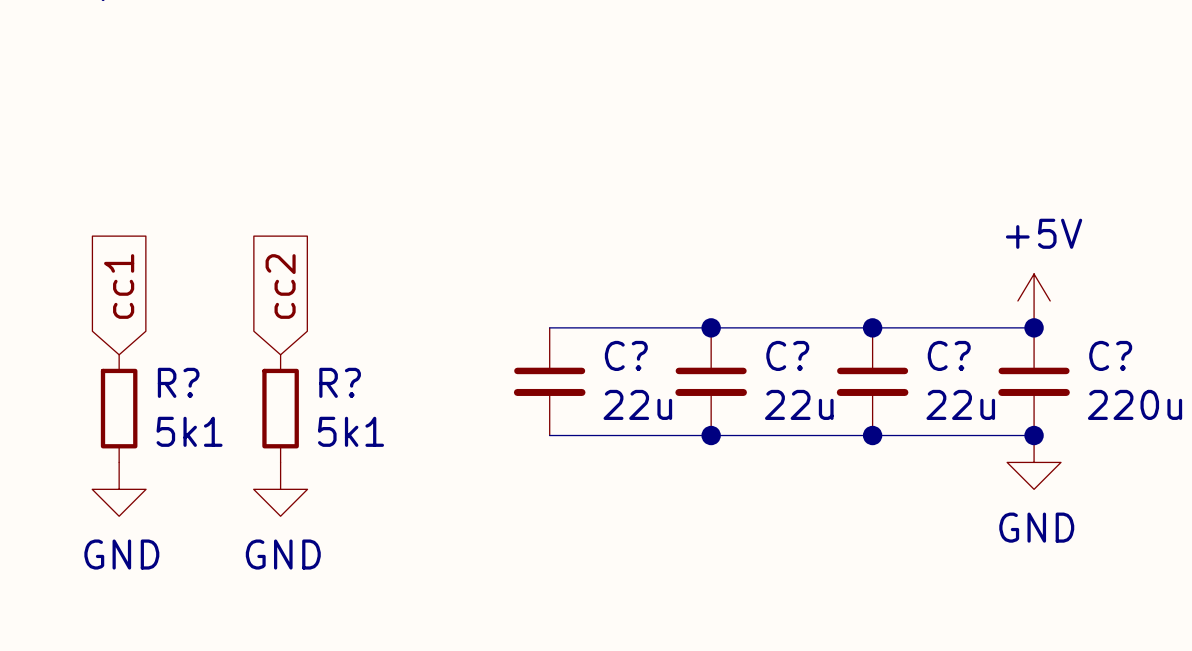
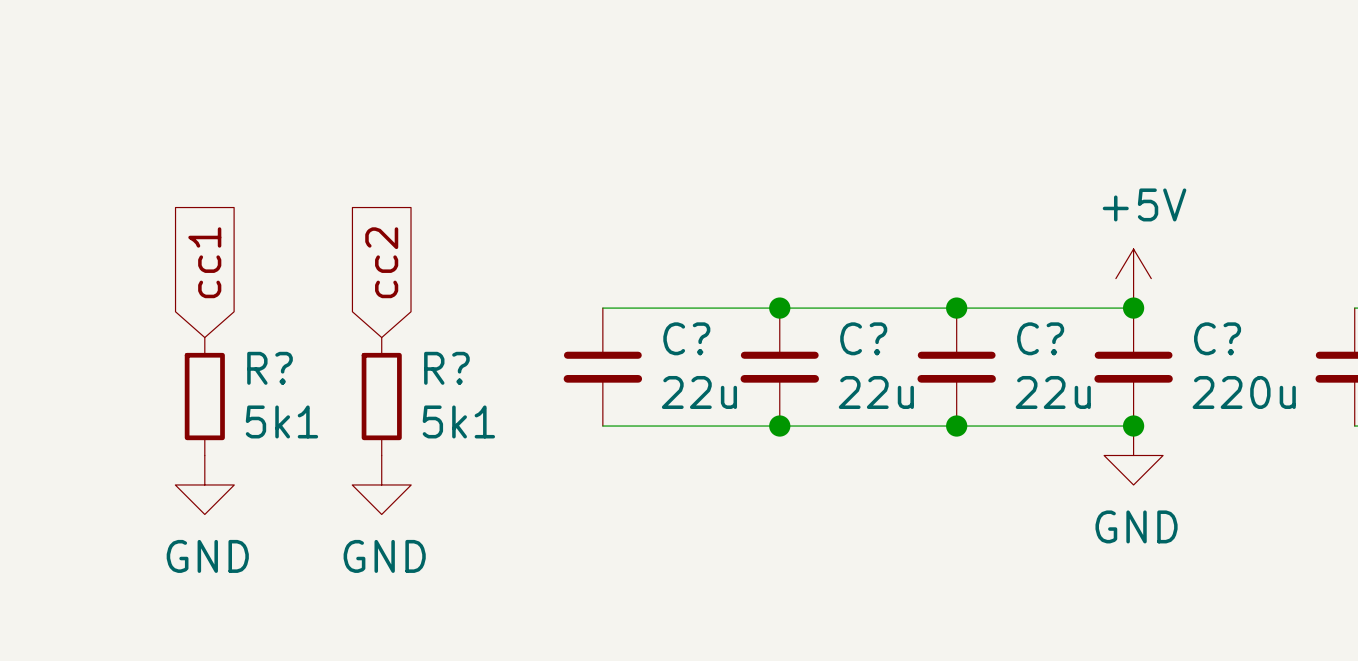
global label position: cc1 (119, 286) -> cc1 (204, 262)
global label position: cc2 (280, 286) -> cc2 (381, 262)
R?: 5k1 (119, 408) -> none
R?: none -> 5k1 (204, 396)
R?: 5k1 (280, 408) -> none
R?: none -> 5k1 (381, 396)
power symbol: GND (119, 489) -> none
power symbol: none -> GND (204, 484)
power symbol: GND (280, 489) -> none
power symbol: none -> GND (381, 484)

